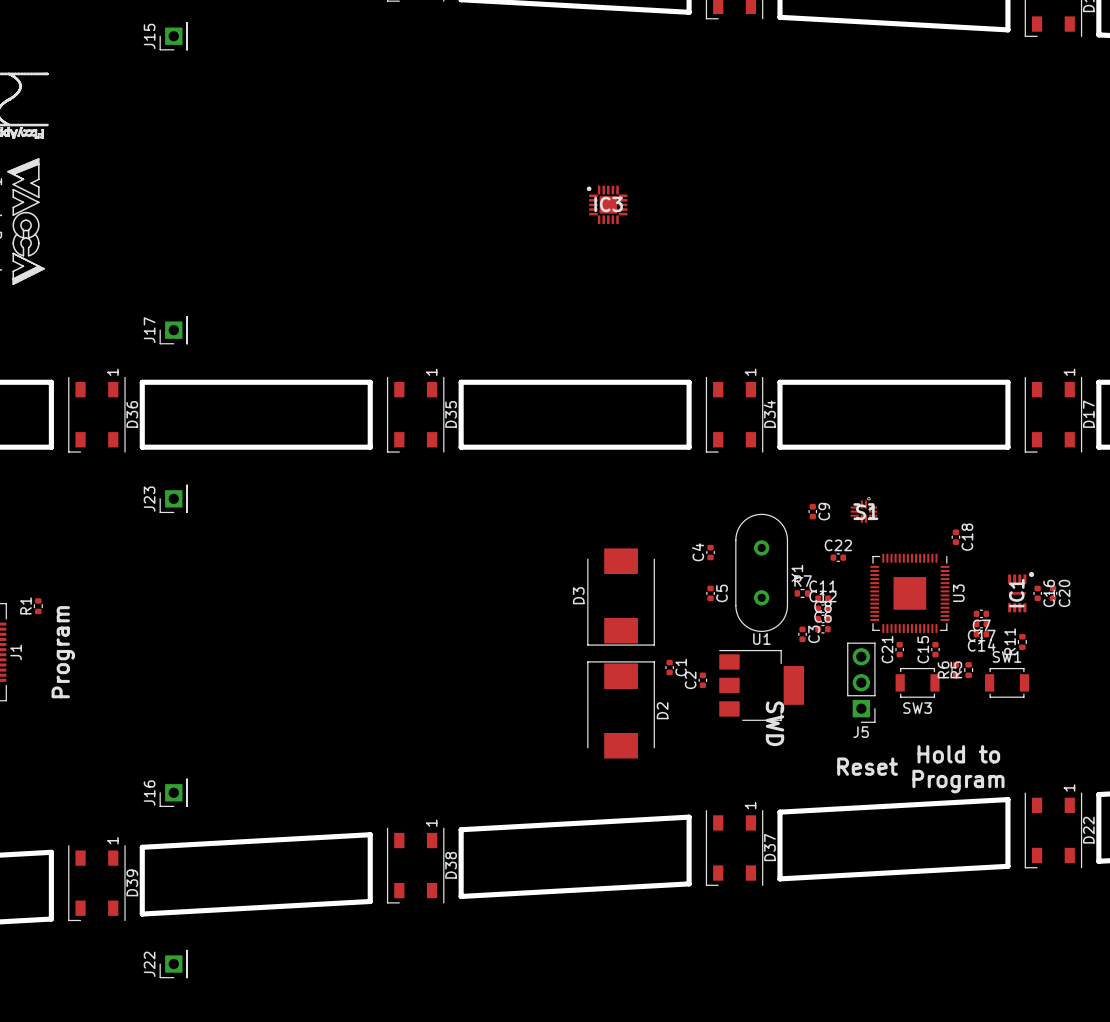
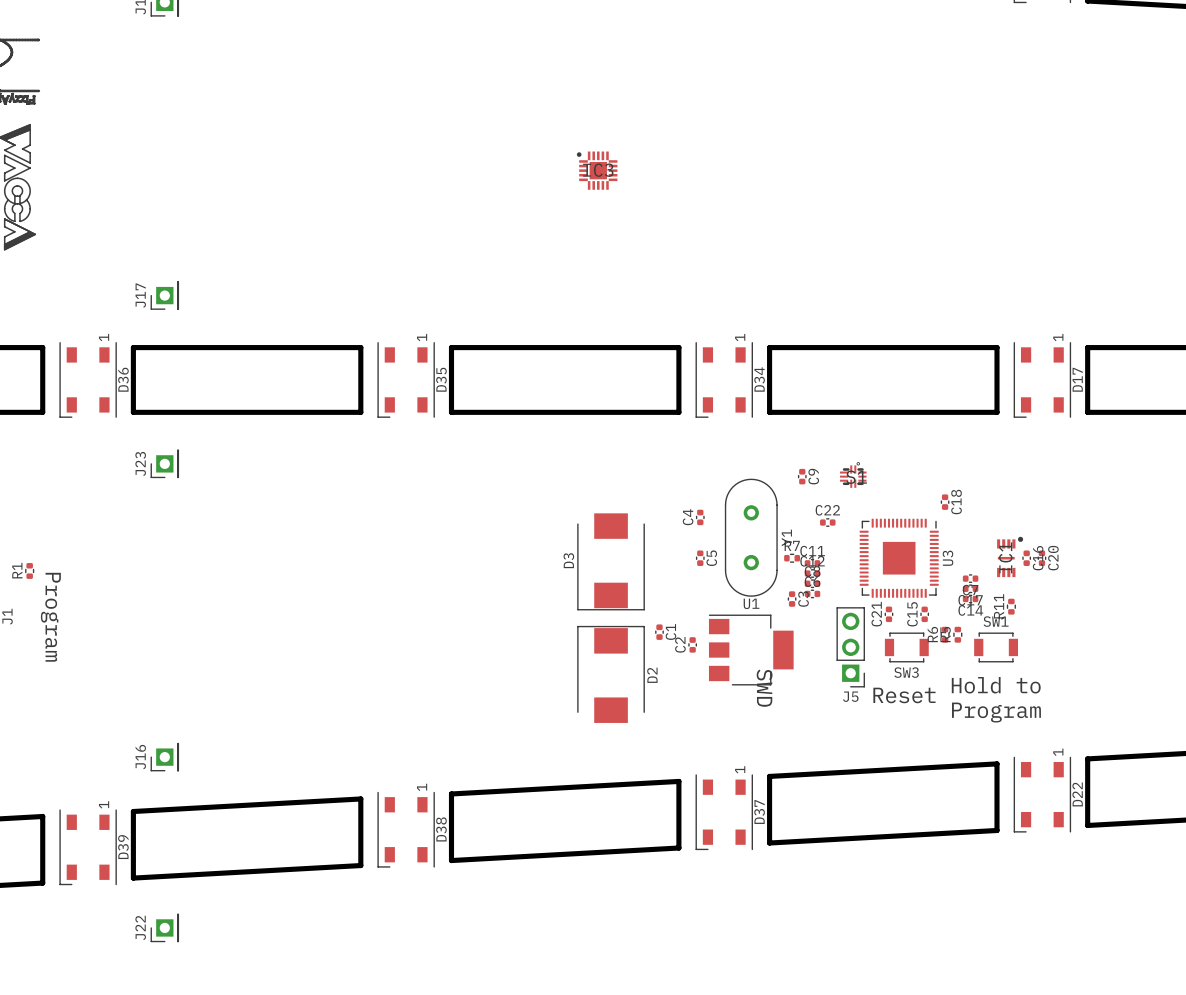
text rotation: 0° (63, 652) -> 180° (50, 617)
text position: Hold to (958, 754) -> Hold to (996, 685)
text position: Reset (867, 766) -> Reset (904, 695)
text position: Program (958, 781) -> Program (996, 712)

